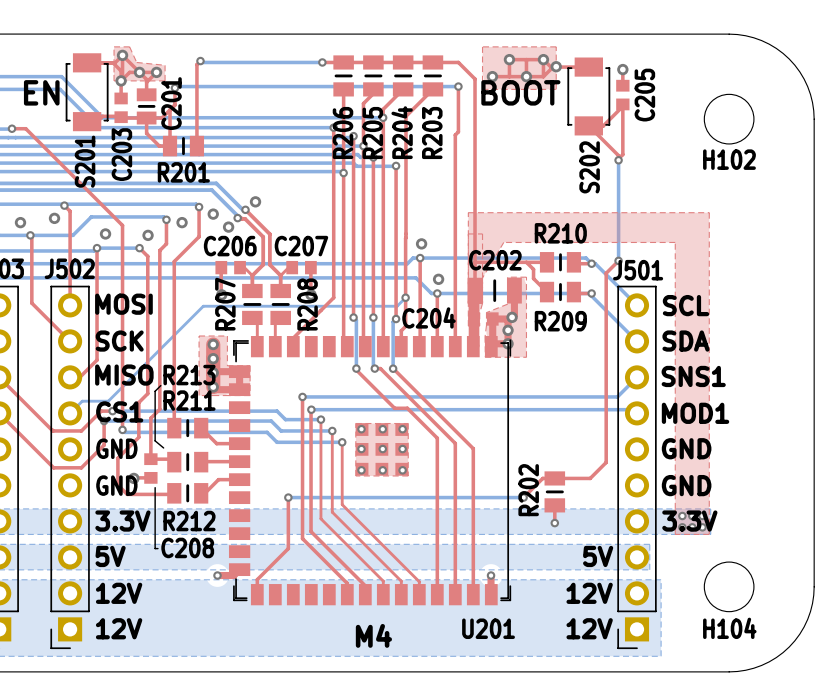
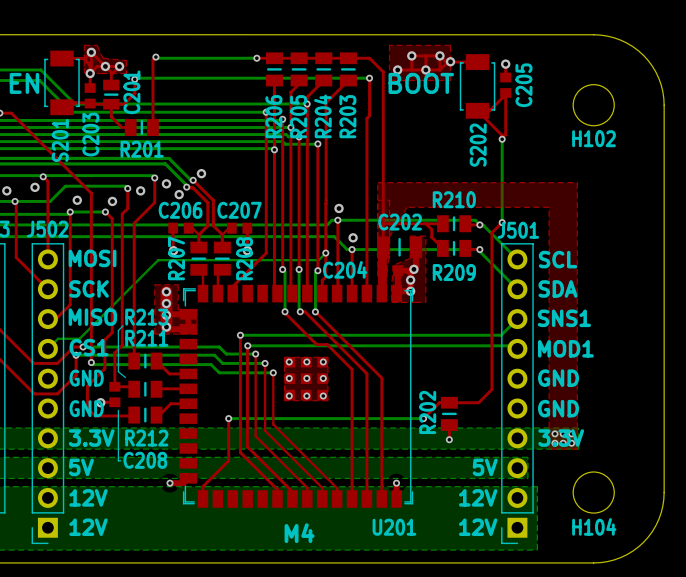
top track: (170, 109) (170, 146) -> none

